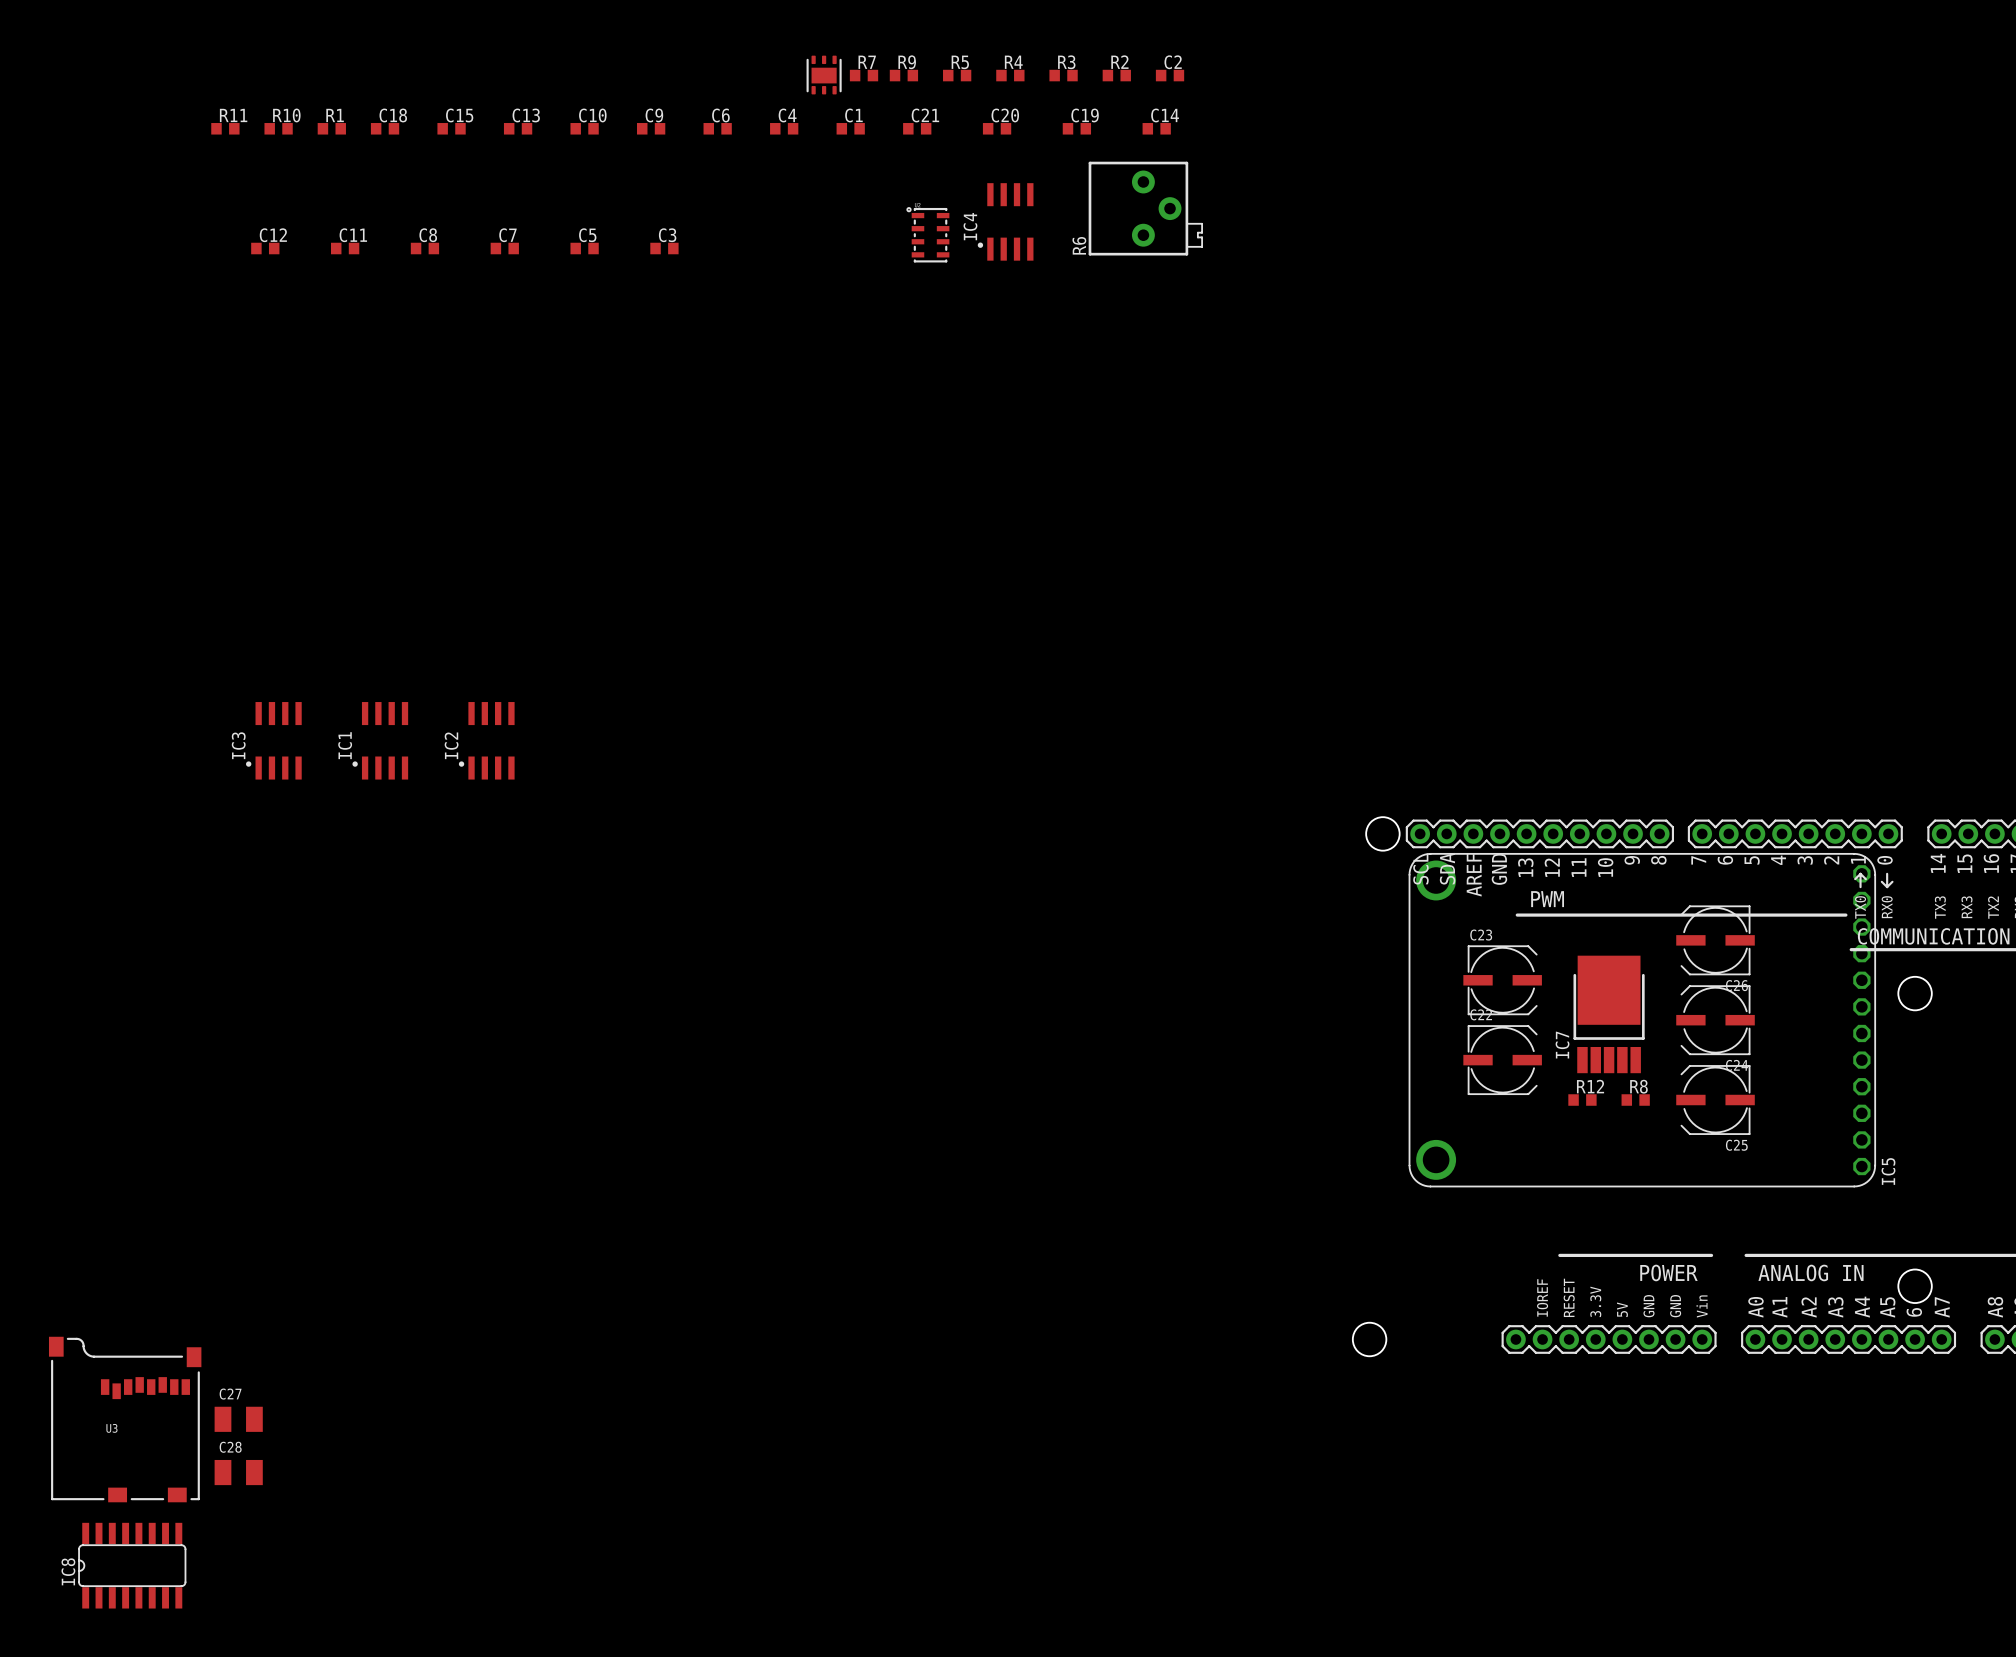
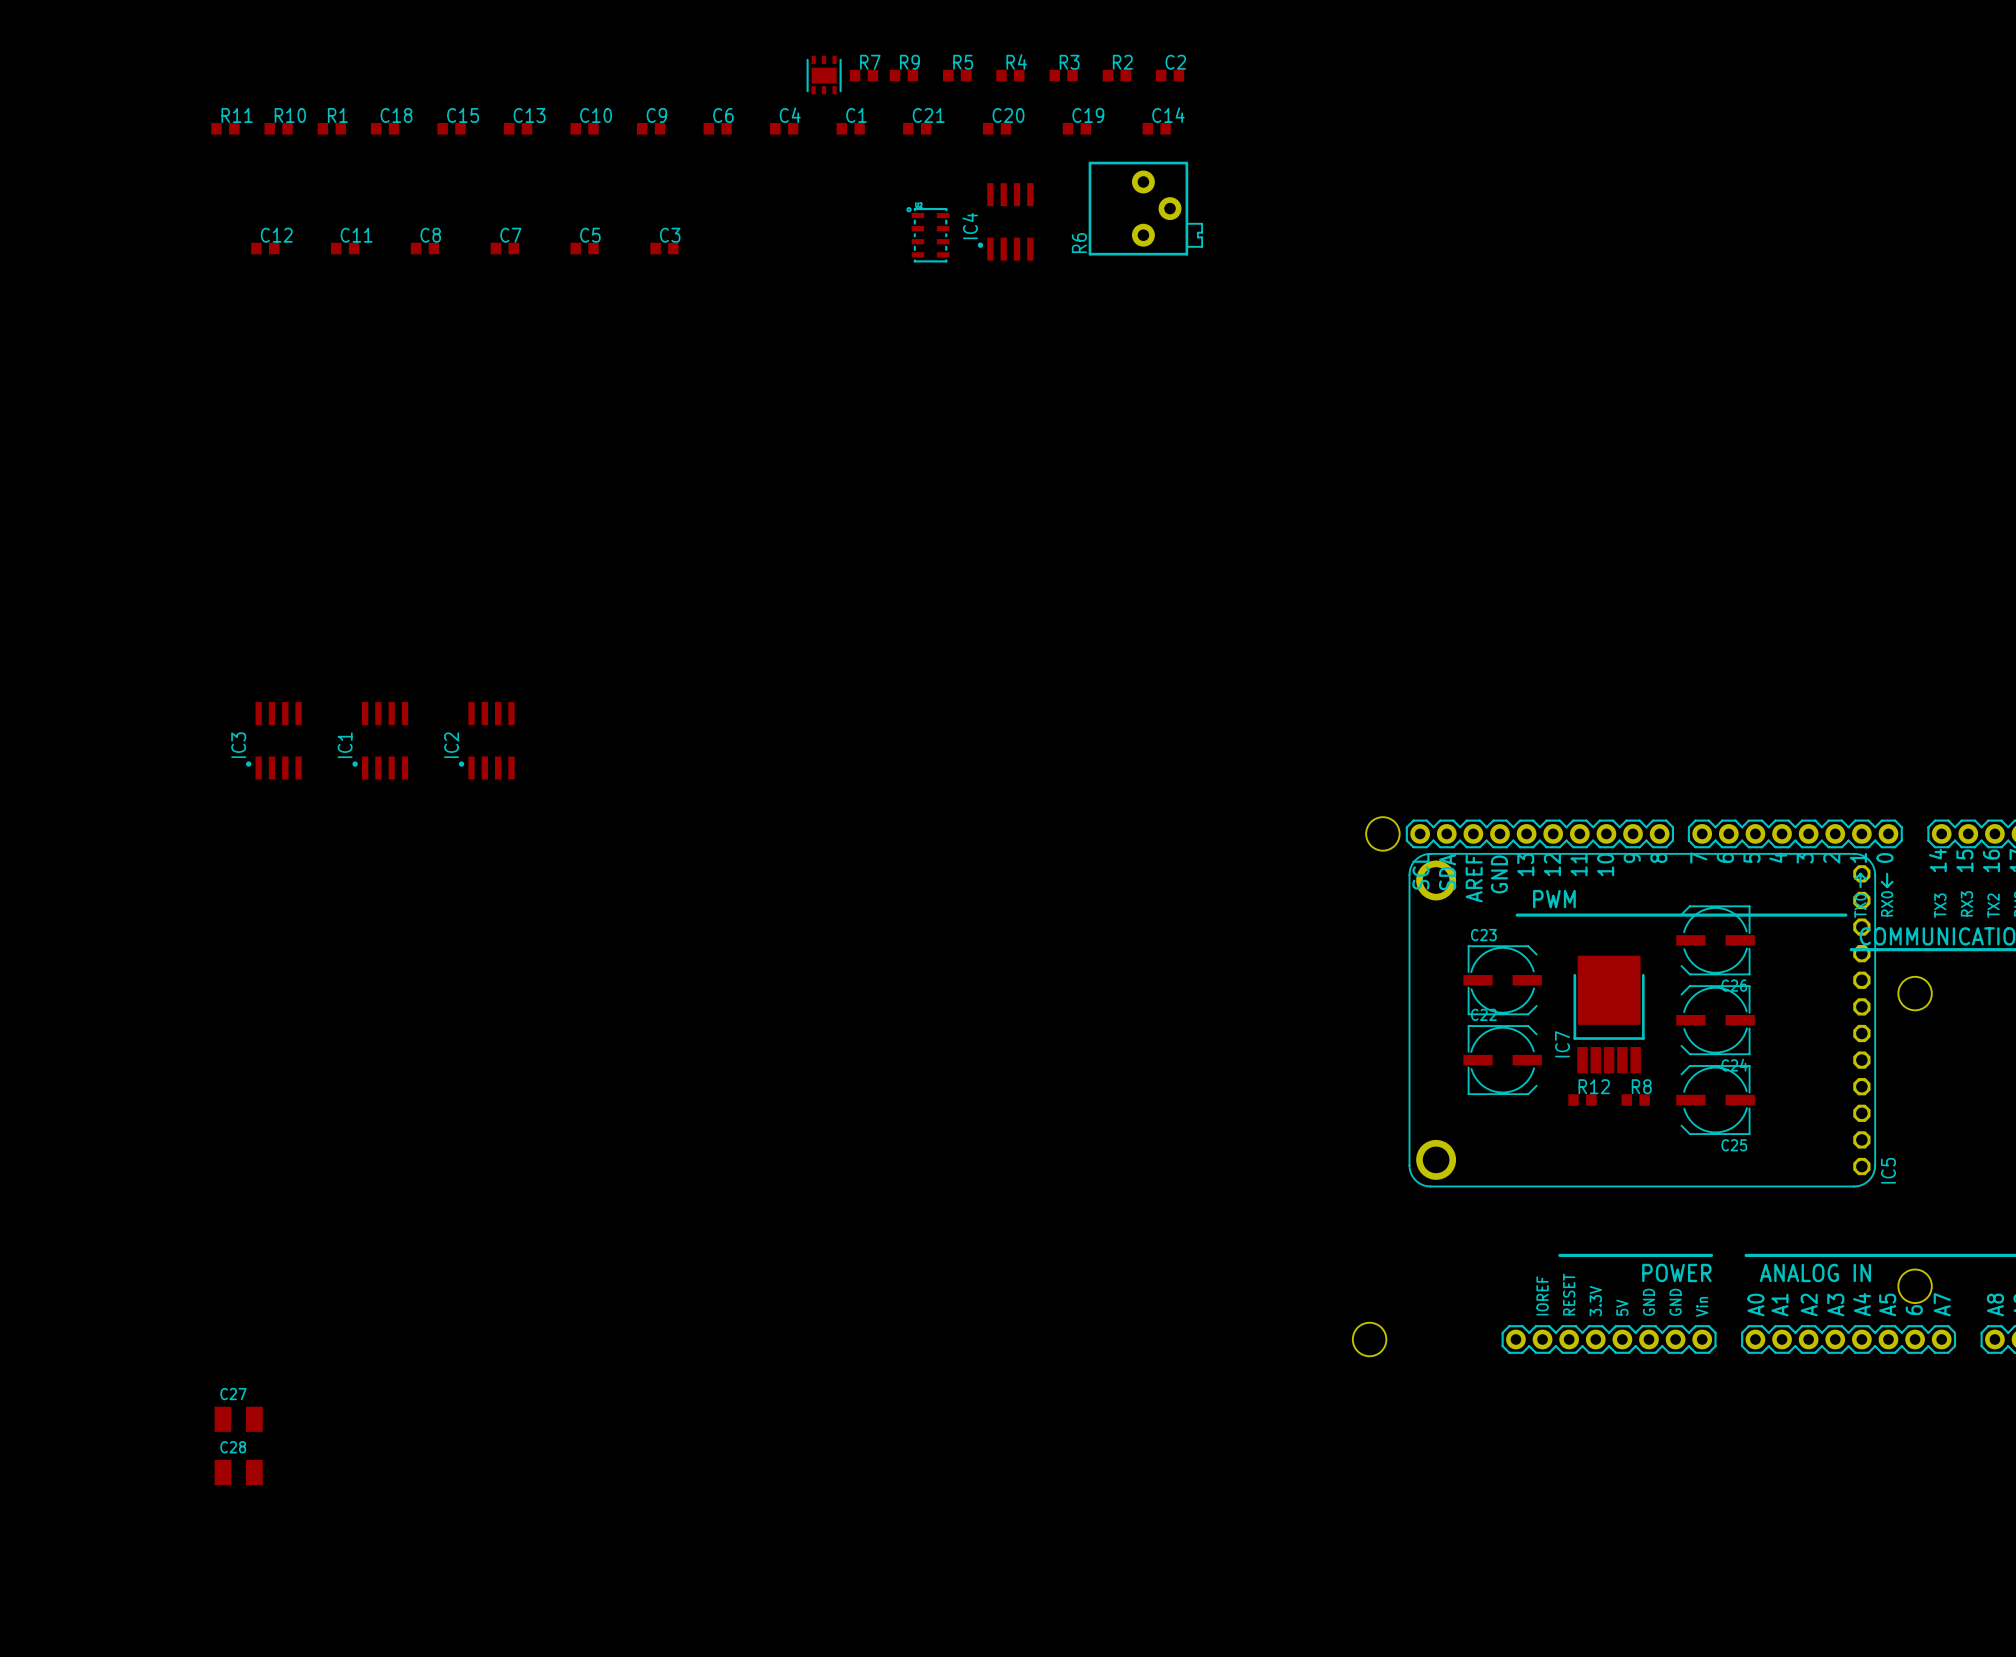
U3: (125, 1419) -> none
IC8: (132, 1565) -> none

